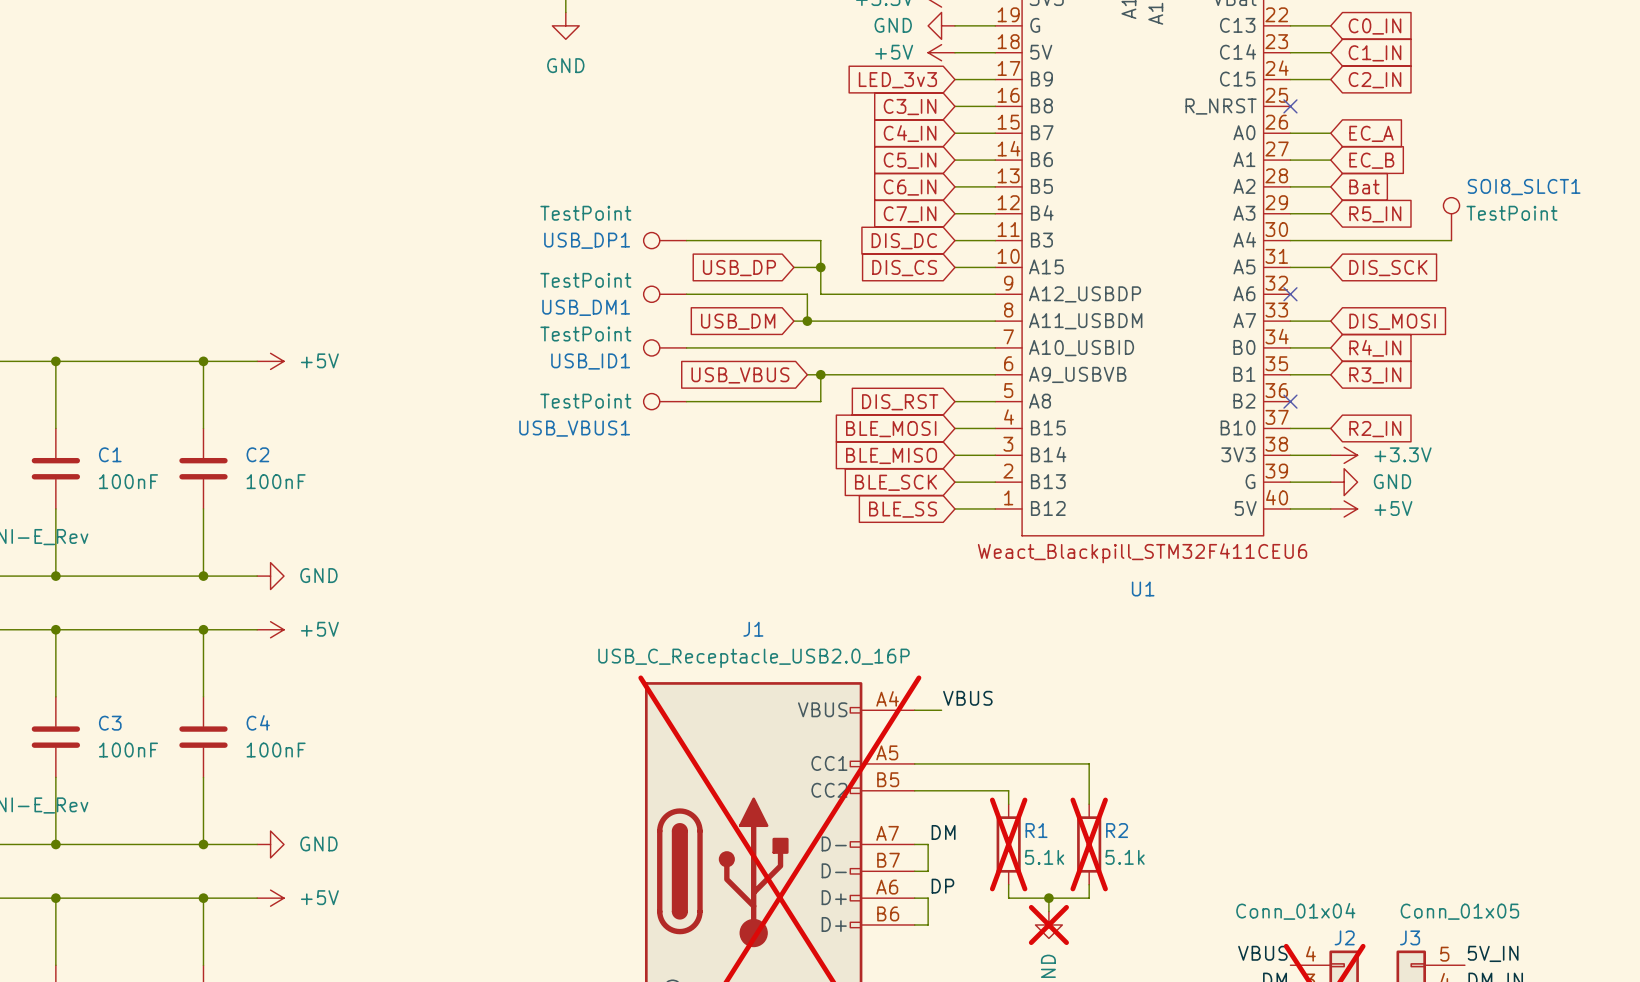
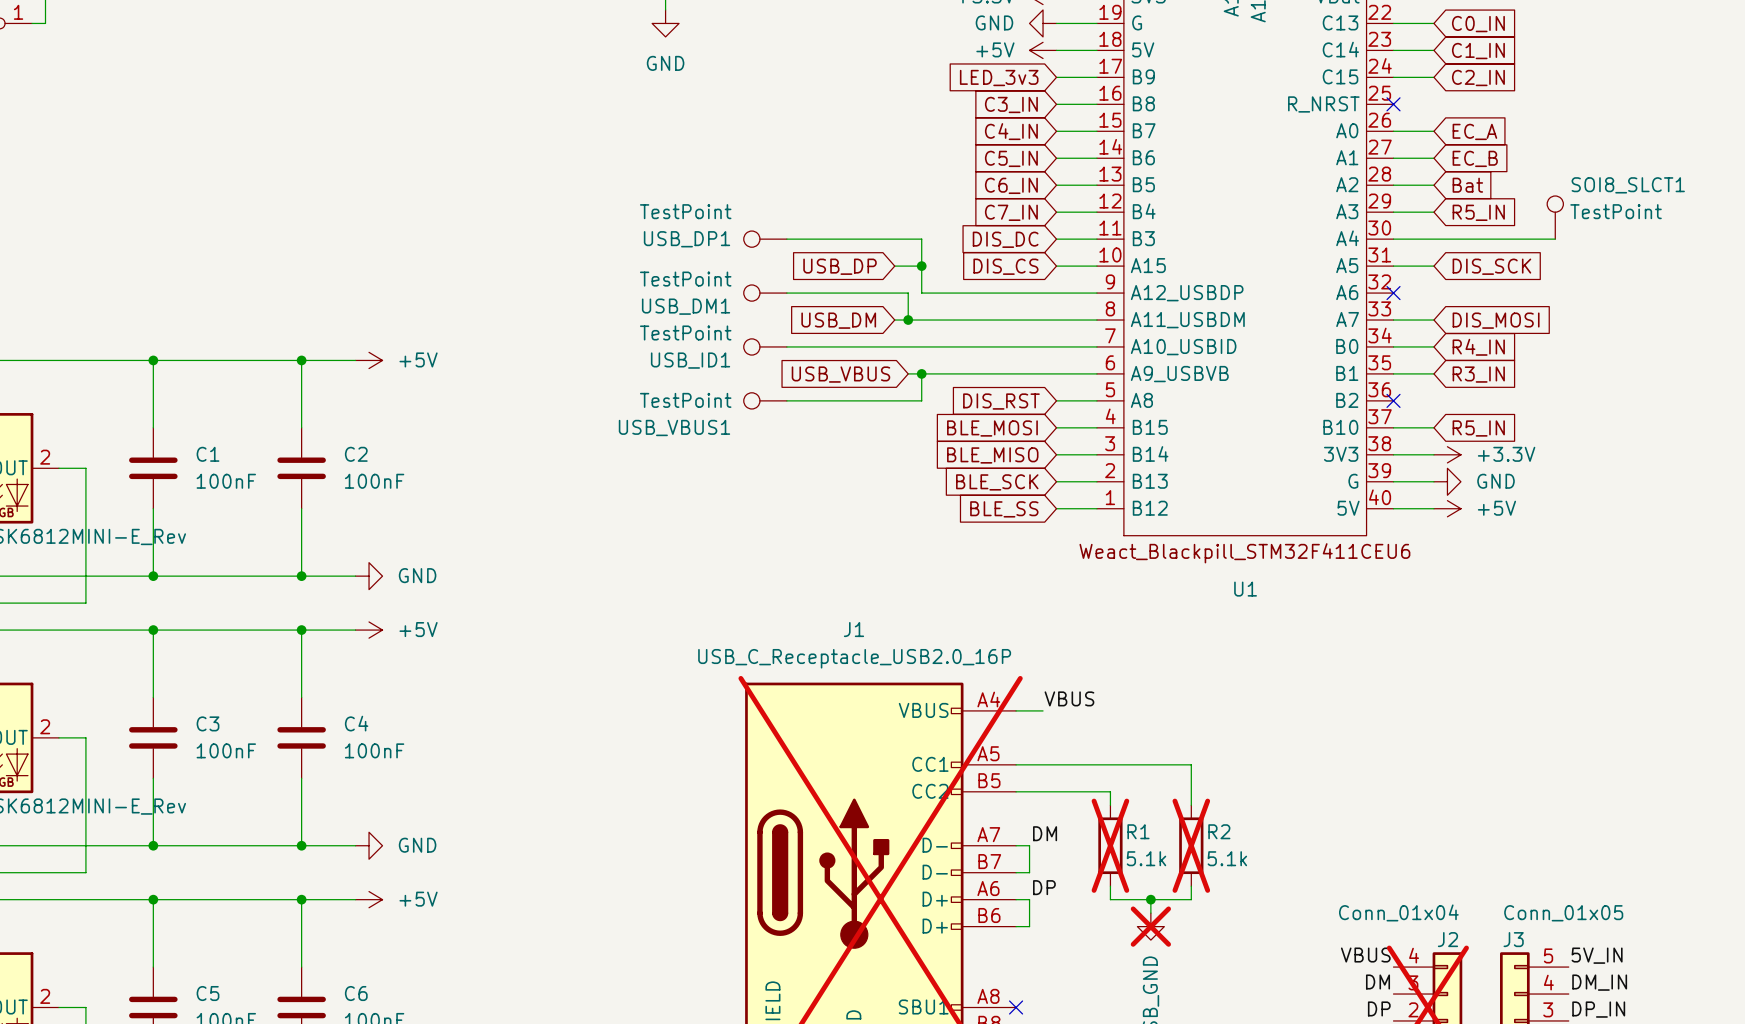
global label: R2_IN (1375, 429) -> R5_IN (1478, 428)

